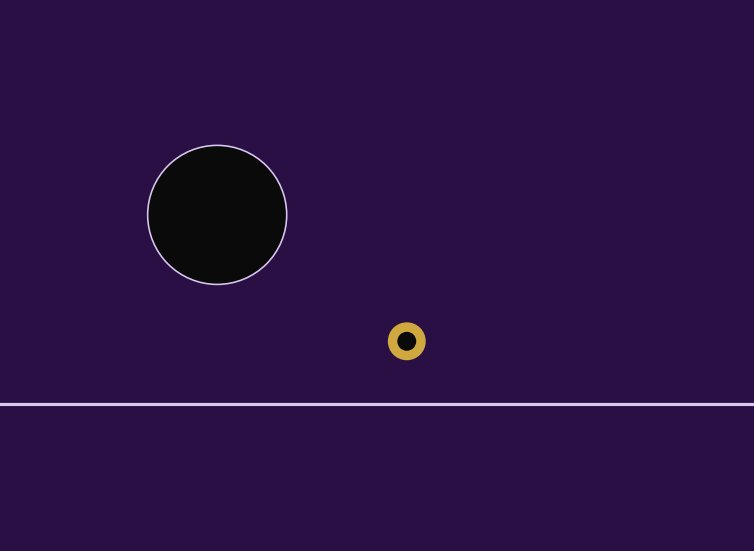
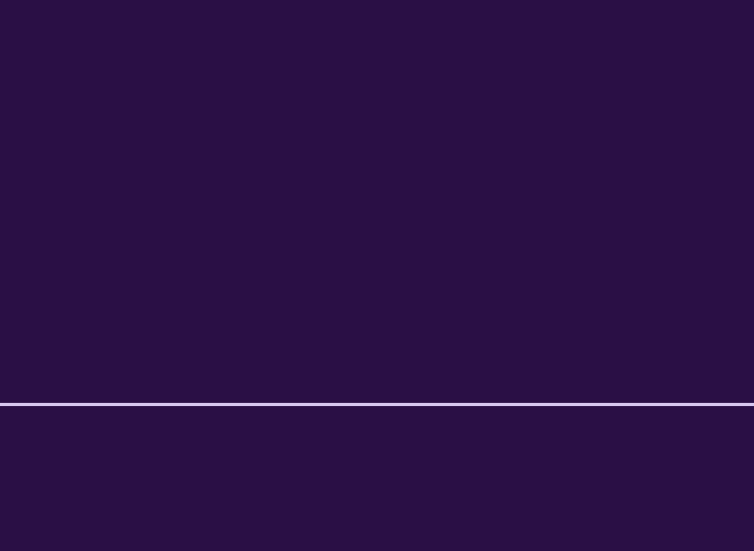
part: (217, 214) -> none
via: (406, 341) -> none

